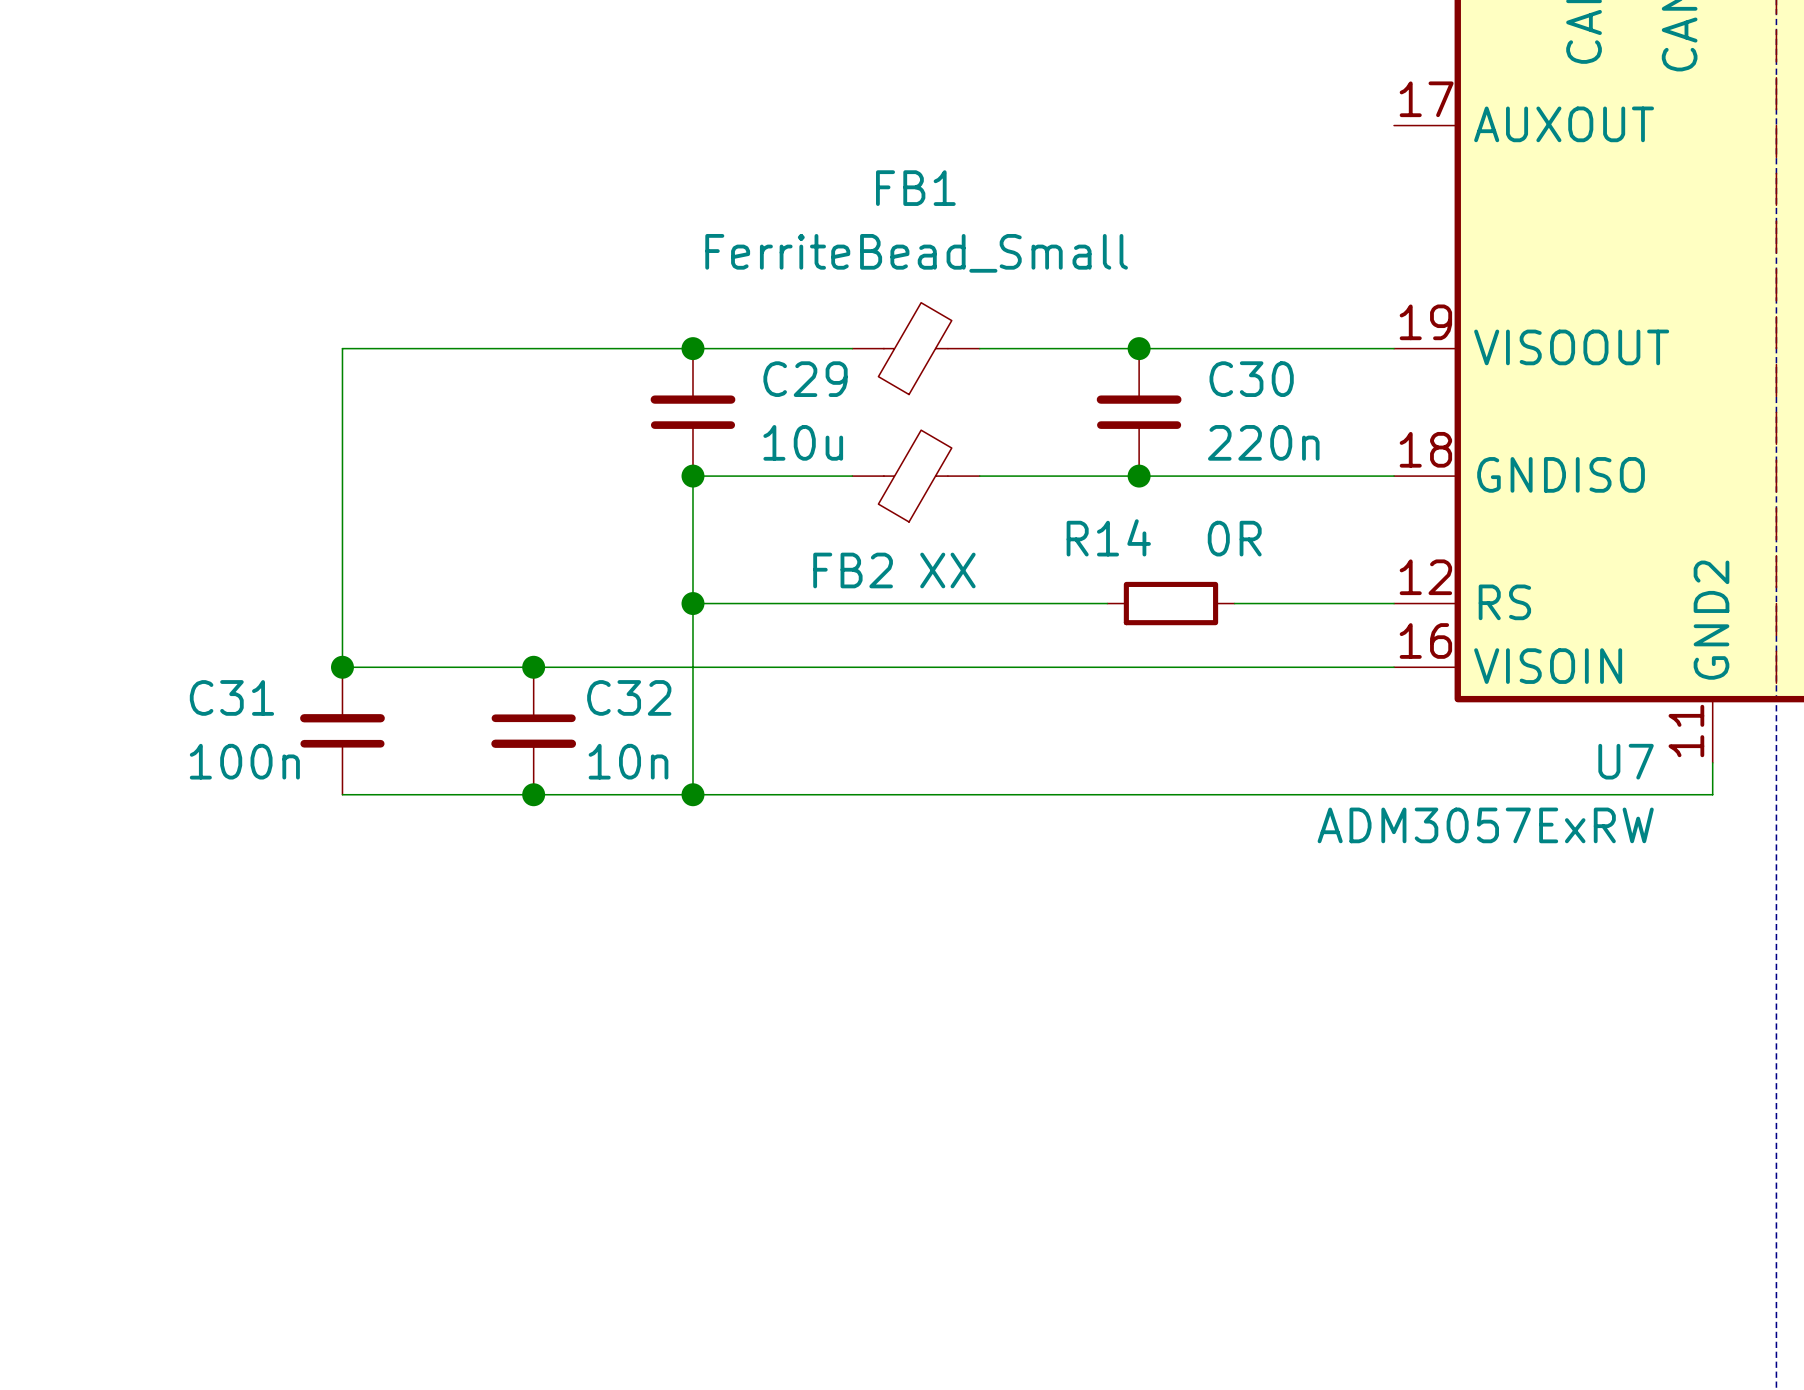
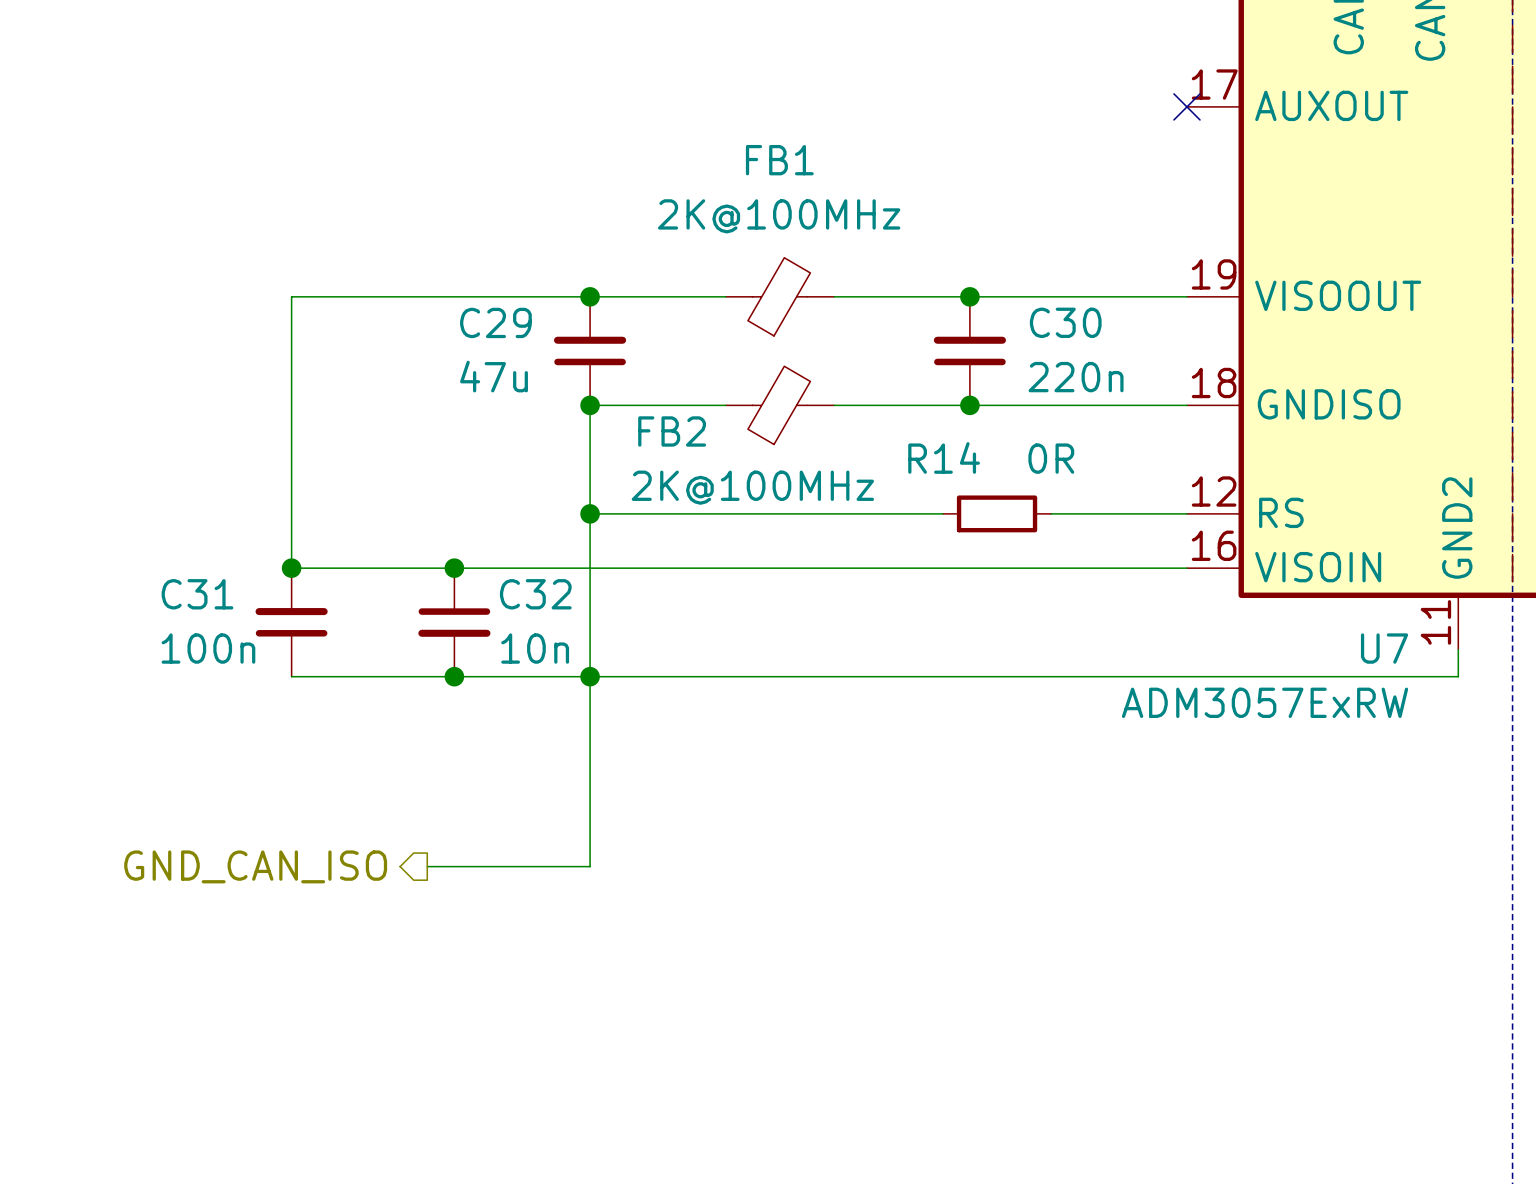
no-connect mark: none -> (1186, 106)
FB1 value: FerriteBead_Small (916, 253) -> 2K@100MHz (779, 216)
C29 name position: C29 (805, 379) -> C29 (495, 322)
C29 value: 10u (803, 442) -> 47u (494, 376)
FB2 name position: FB2 (853, 570) -> FB2 (672, 431)
FB2 value: XX (947, 570) -> 2K@100MHz (752, 487)
wire: none -> (590, 676) (590, 866) (427, 866)
hierarchical label: none -> GND_CAN_ISO (255, 866)

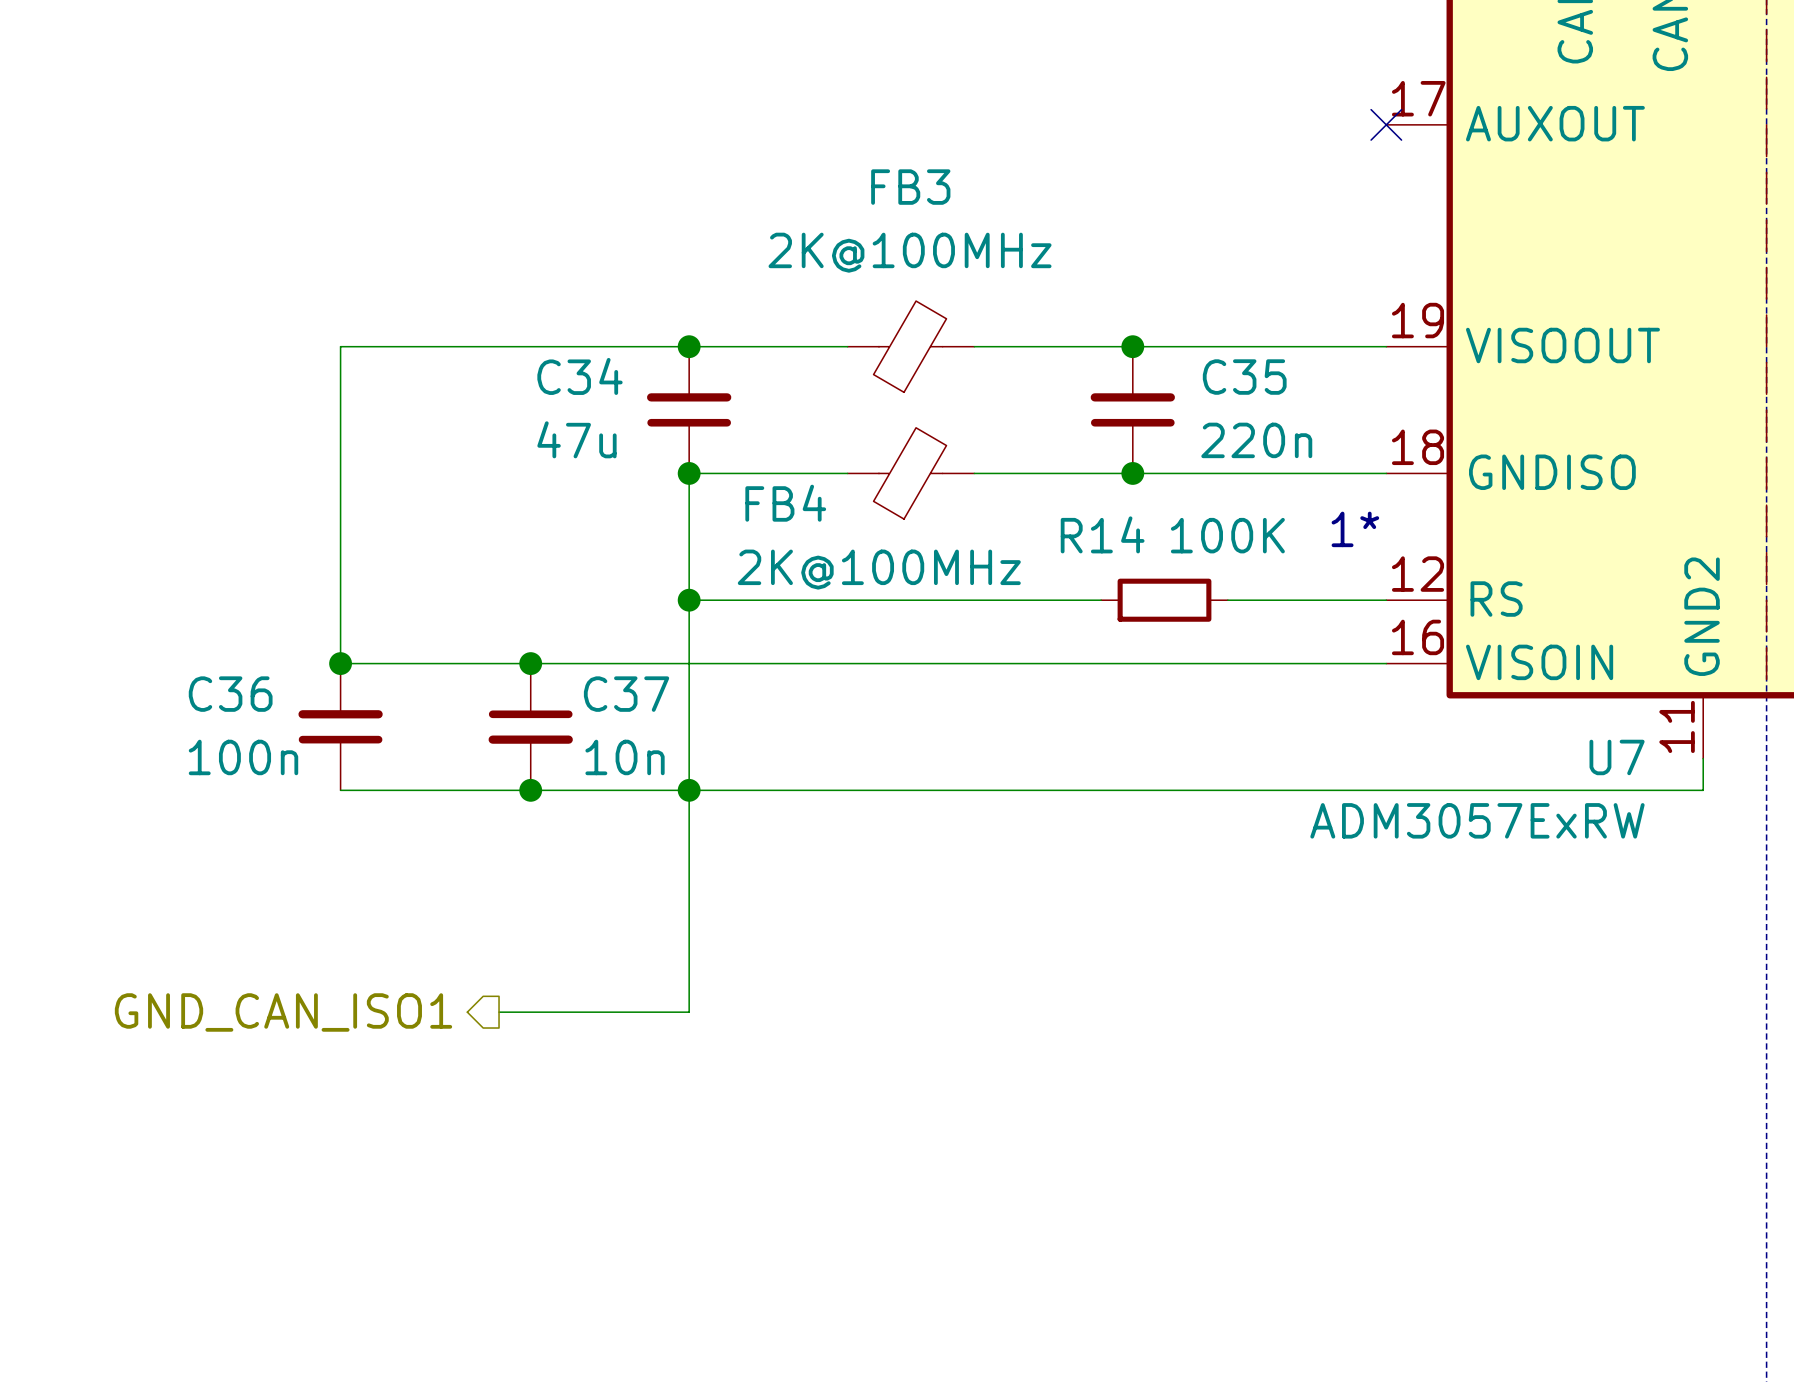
FB1 name: FB1 (779, 160) -> FB3 (910, 187)
C29 name: C29 (495, 322) -> C34 (579, 376)
C30 name: C30 (1065, 322) -> C35 (1244, 377)
FB2 name: FB2 (672, 431) -> FB4 (785, 503)
text: none -> 1* (1355, 529)
R14 value: 0R (1051, 458) -> 100K (1227, 535)
C31 name: C31 (197, 594) -> C36 (230, 694)
C32 name: C32 (535, 594) -> C37 (626, 694)
hierarchical label: GND_CAN_ISO (255, 866) -> GND_CAN_ISO1 (283, 1012)

